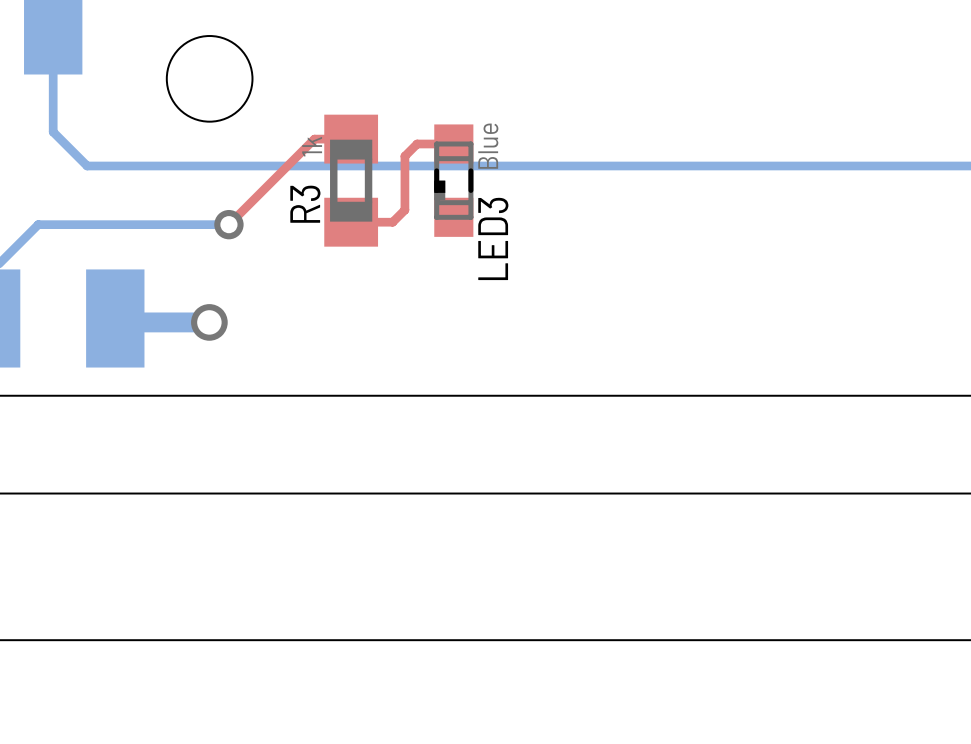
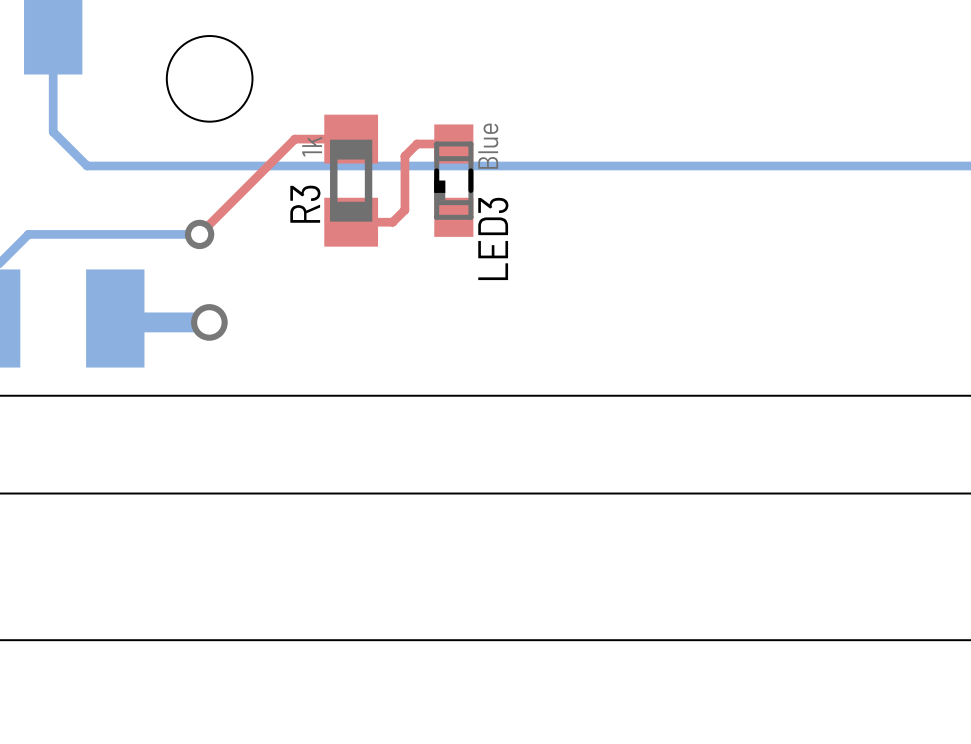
top track: (314, 139) (228, 224) -> (314, 139) (294, 139) (199, 234)
bottom track: (228, 224) (38, 224) (28, 234) -> (199, 234) (28, 234)
via position: (228, 224) -> (199, 234)

